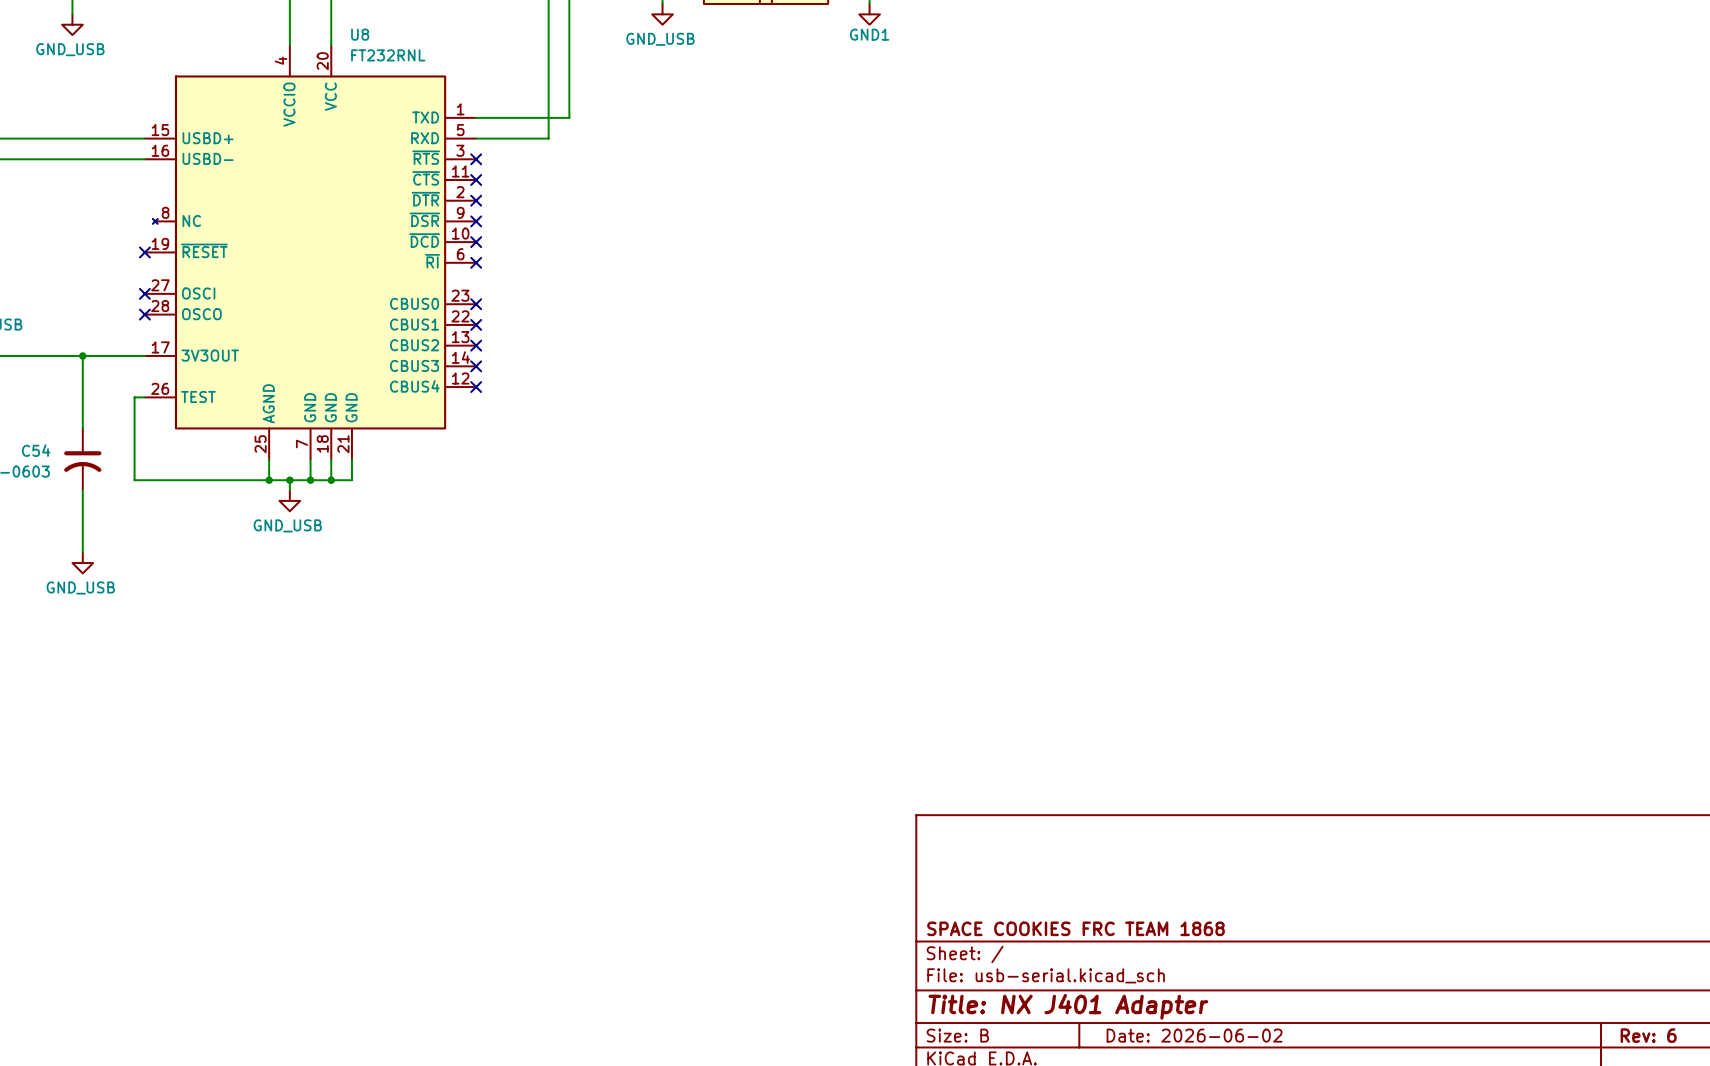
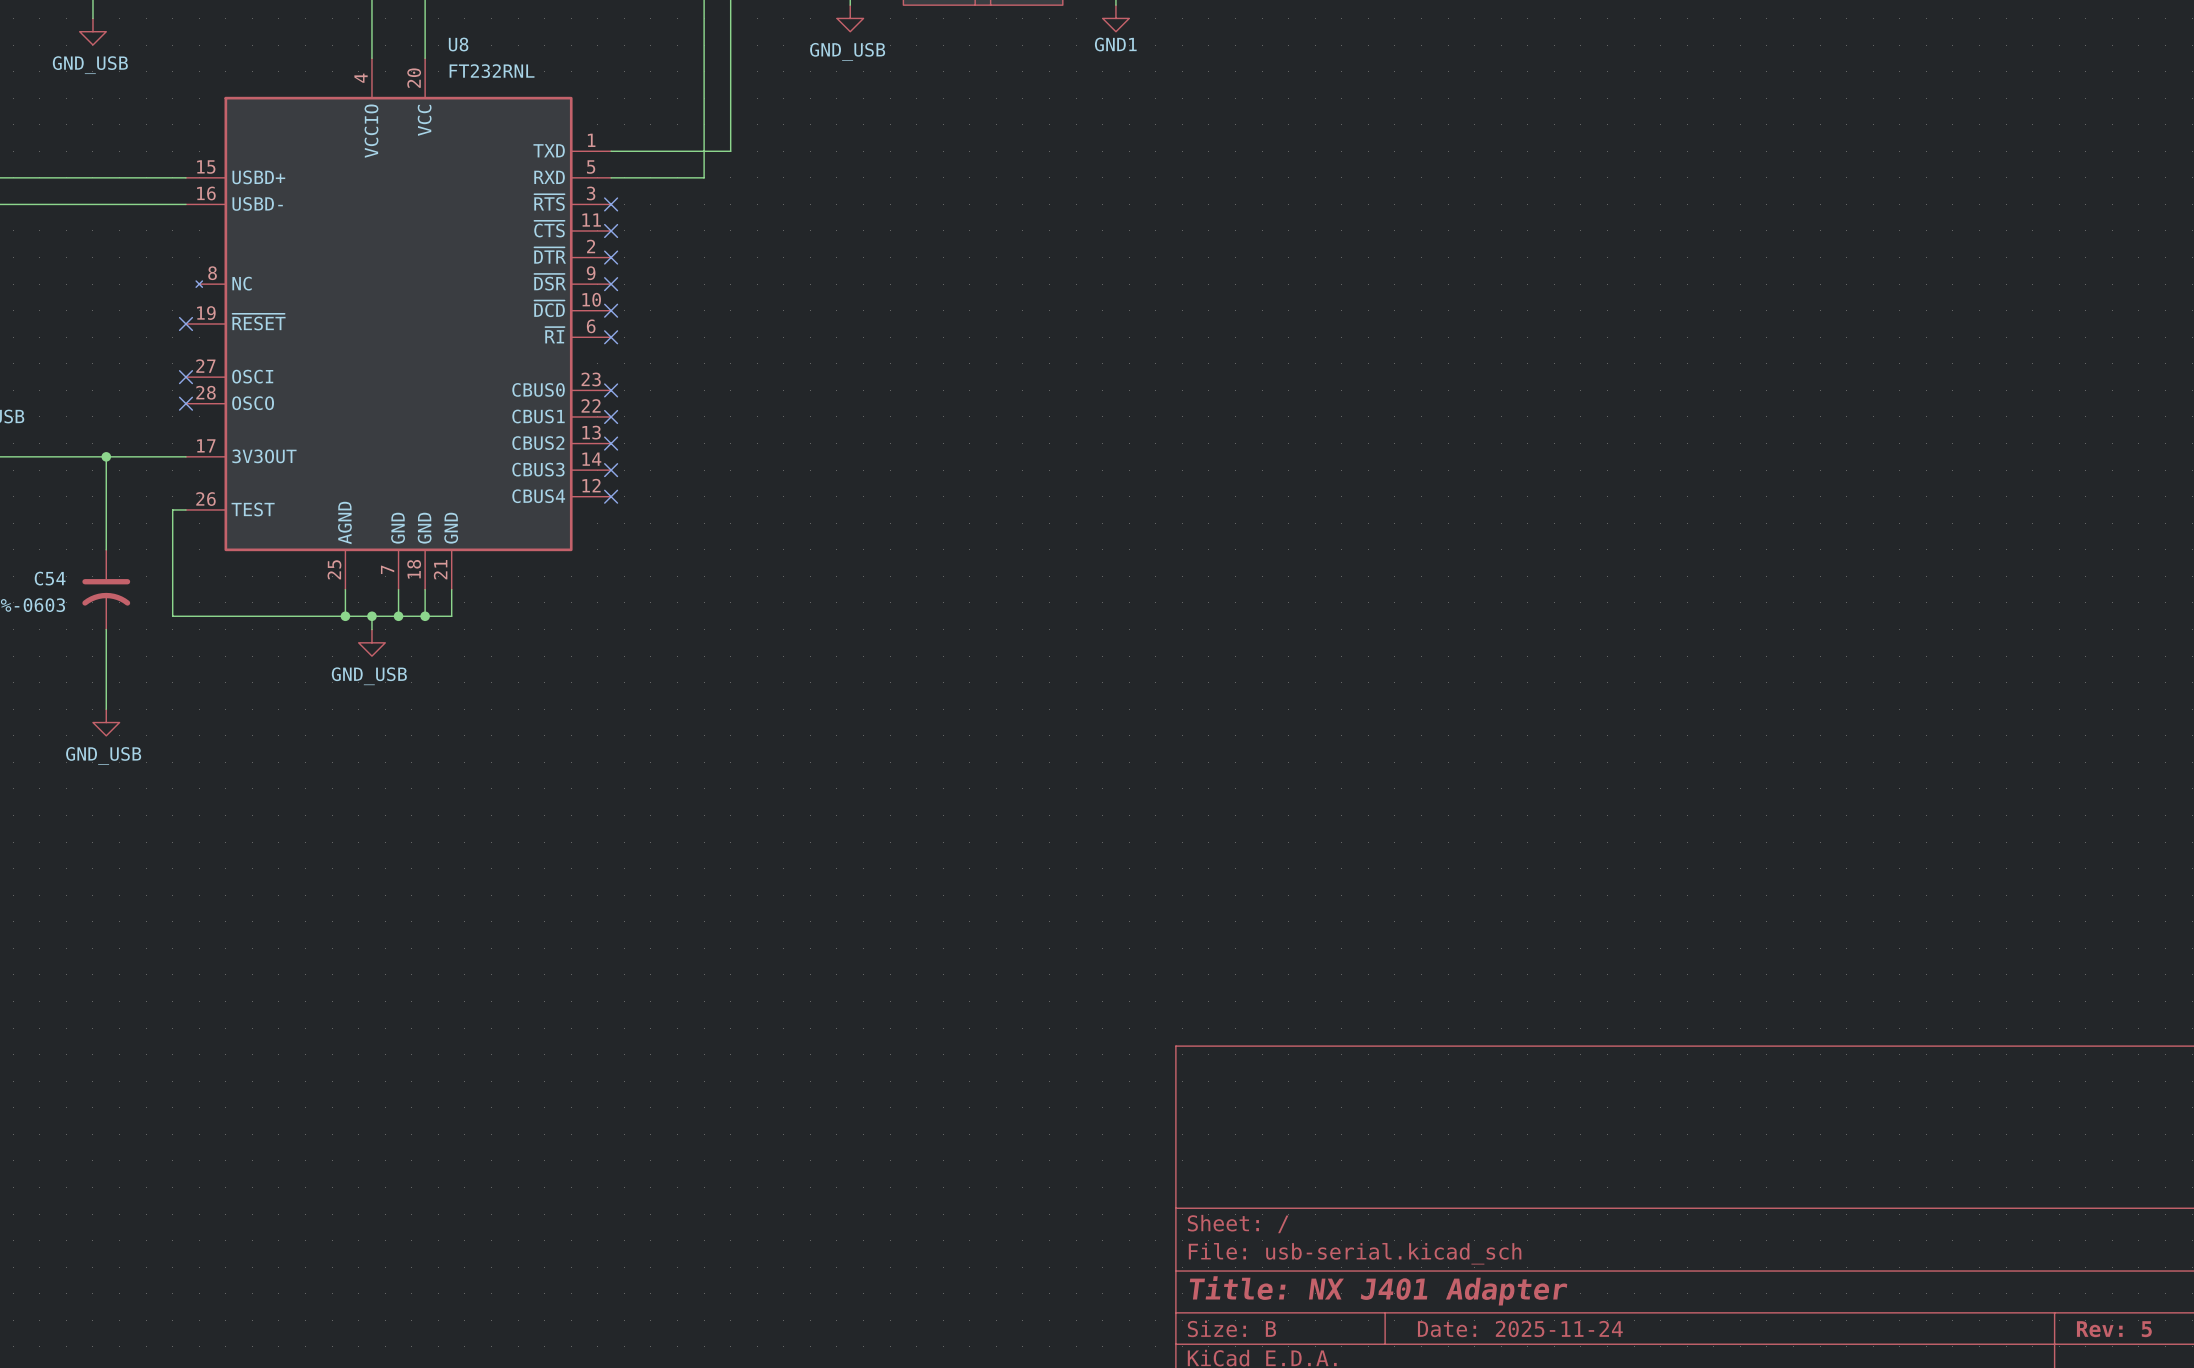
title block: SPACE COOKIES FRC TEAM 1868 (1075, 928) -> none
title block: Date: 2026-06-02 (1194, 1035) -> Date: 2025-11-24 (1520, 1329)
title block: Rev: 6 (1648, 1035) -> Rev: 5 (2114, 1329)

